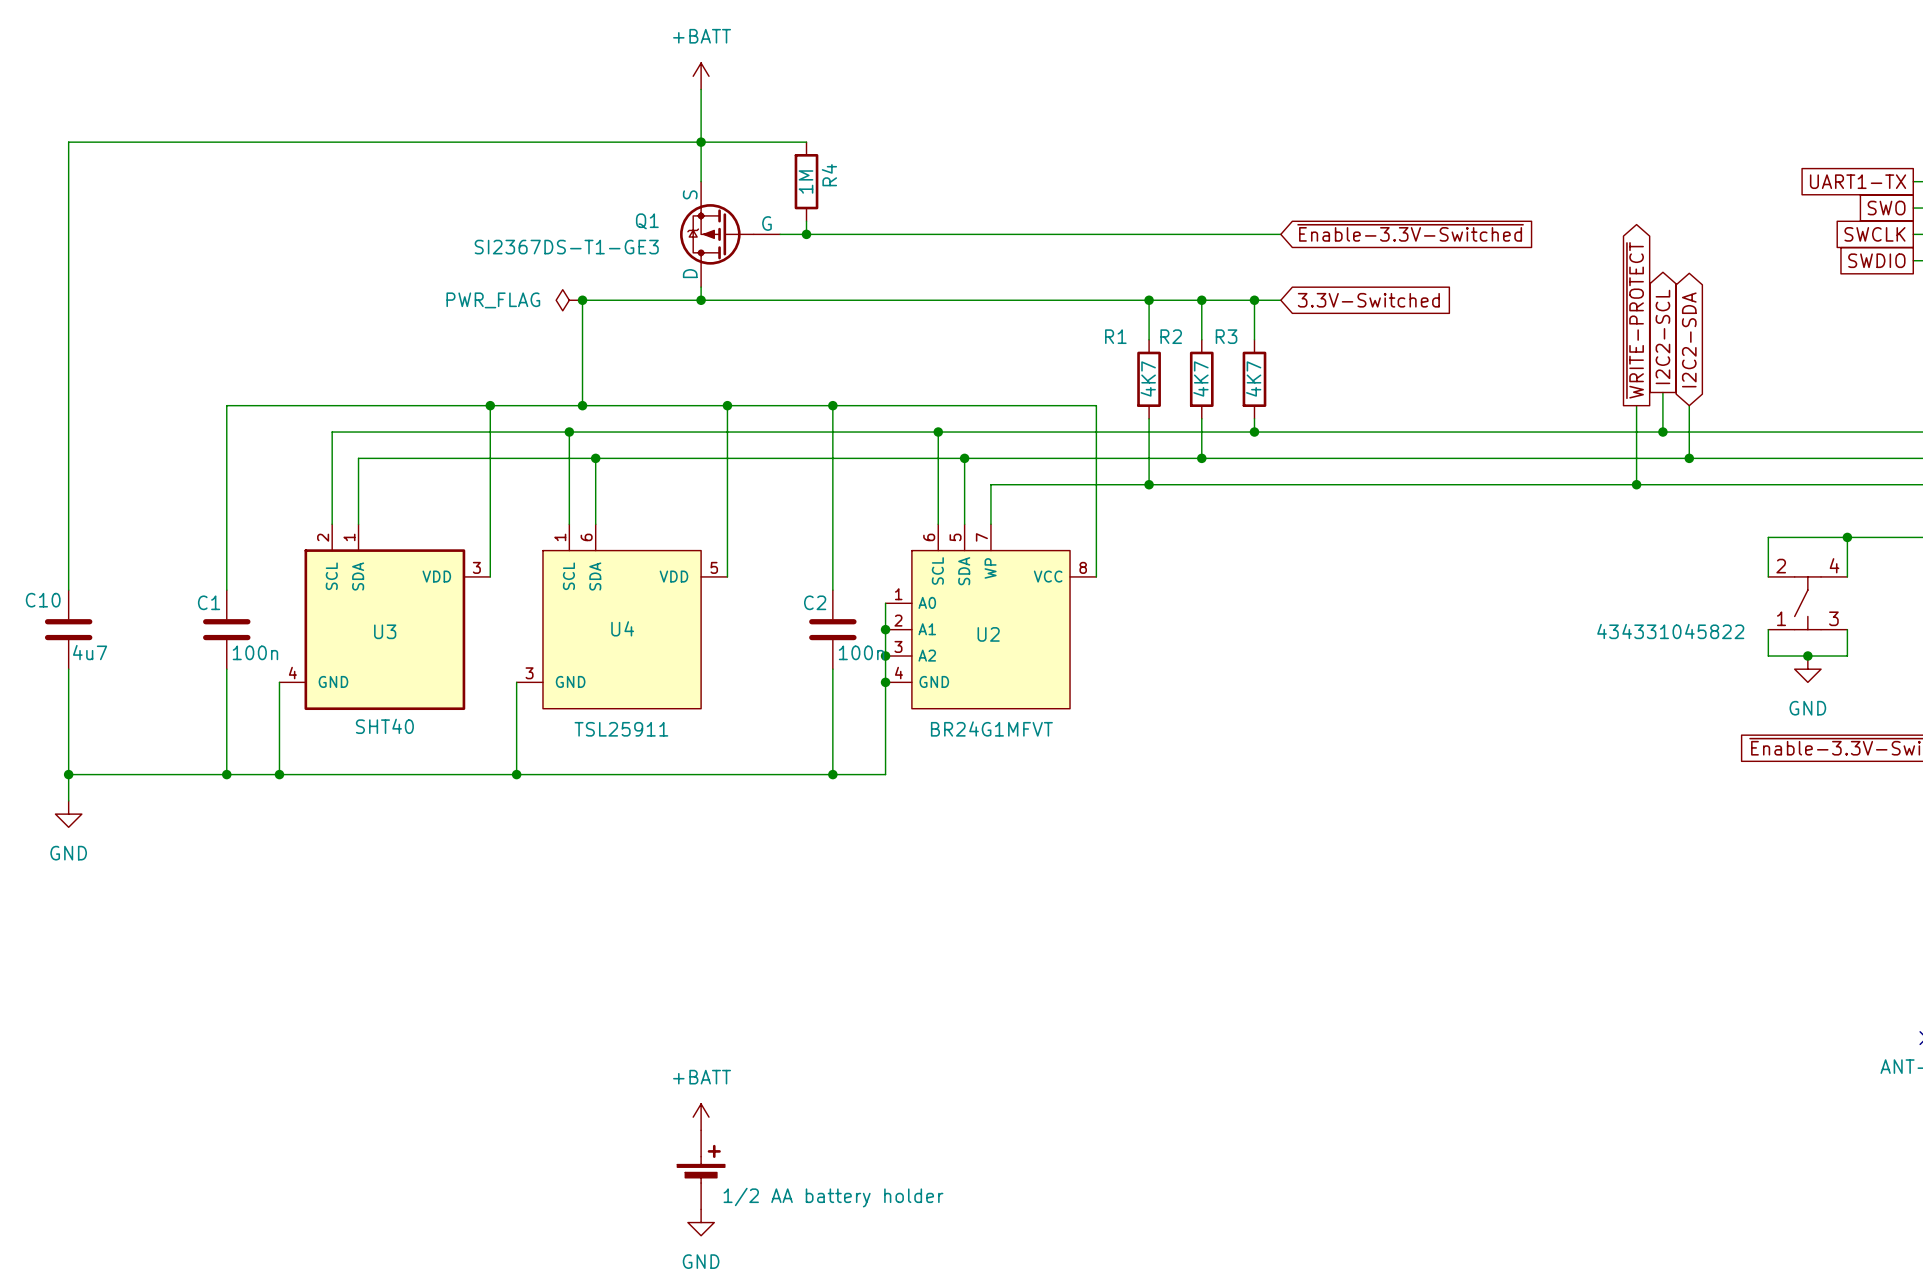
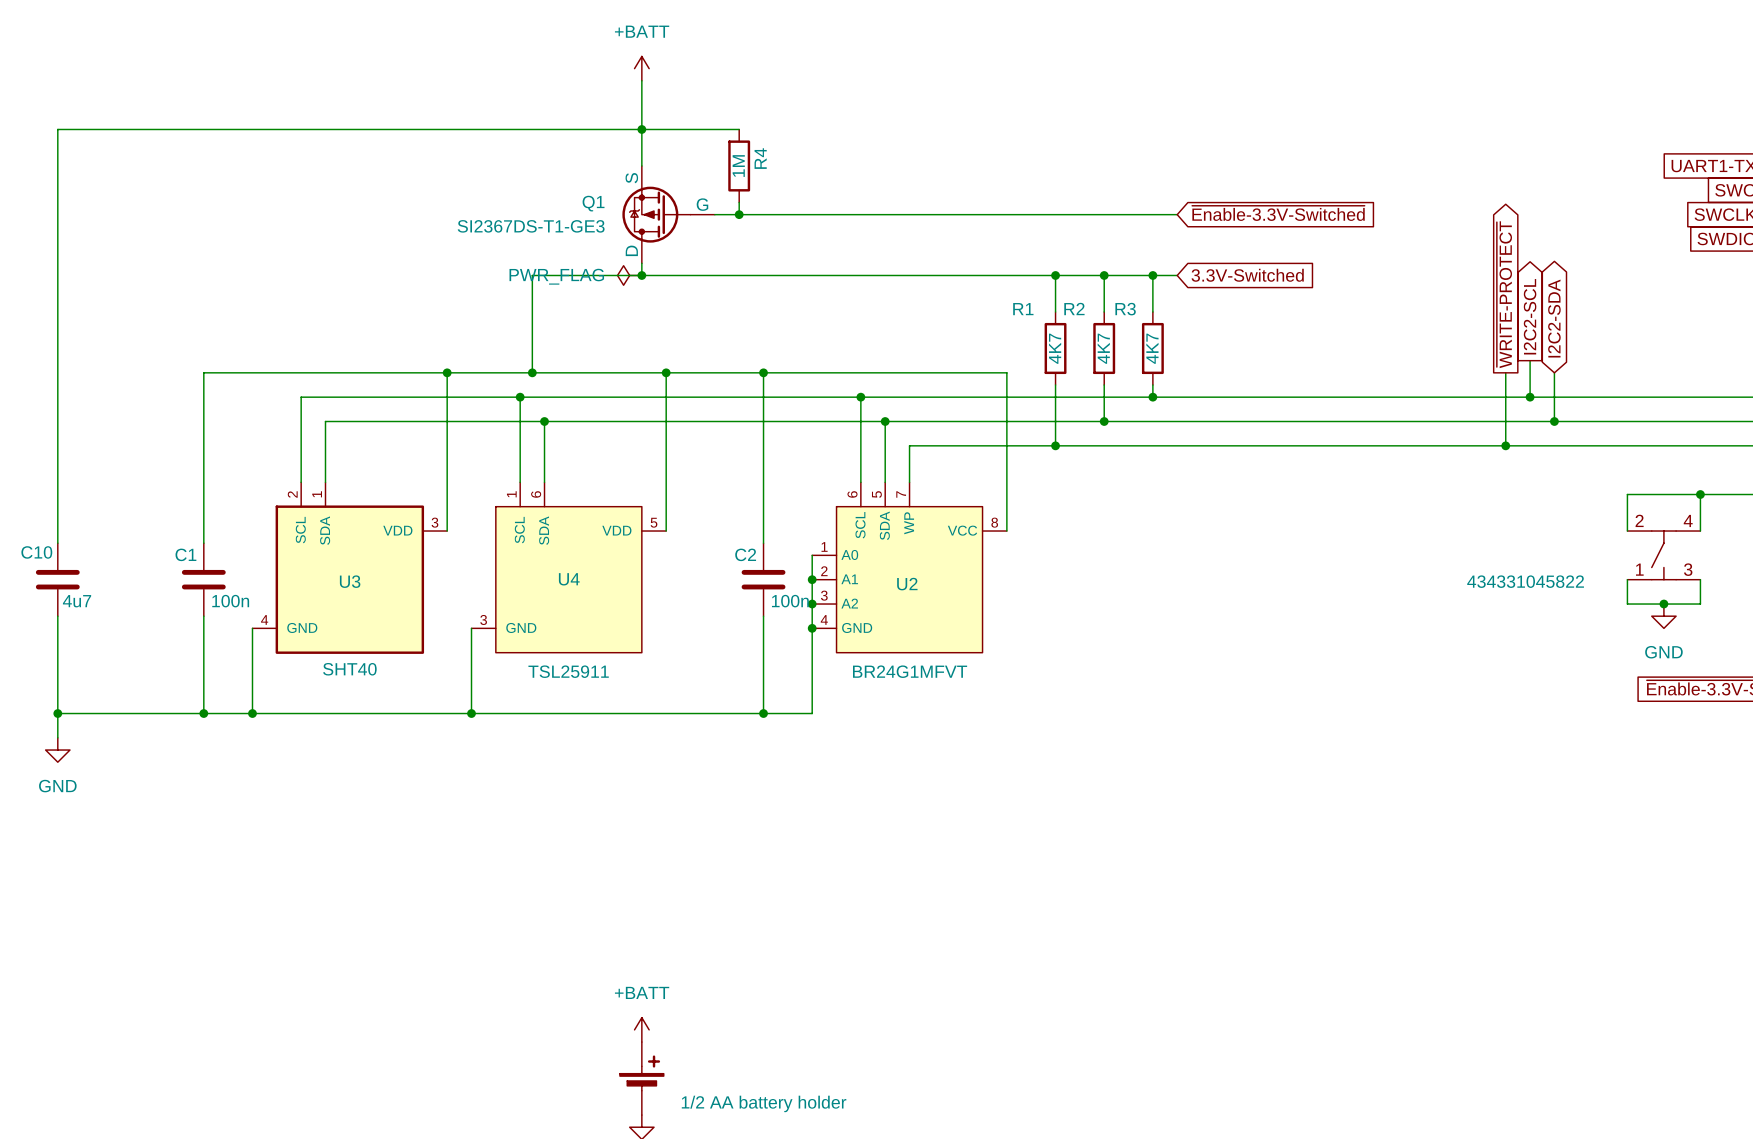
power symbol position: PWR_FLAG (569, 300) -> PWR_FLAG (629, 275)
junction: (582, 300) -> none

